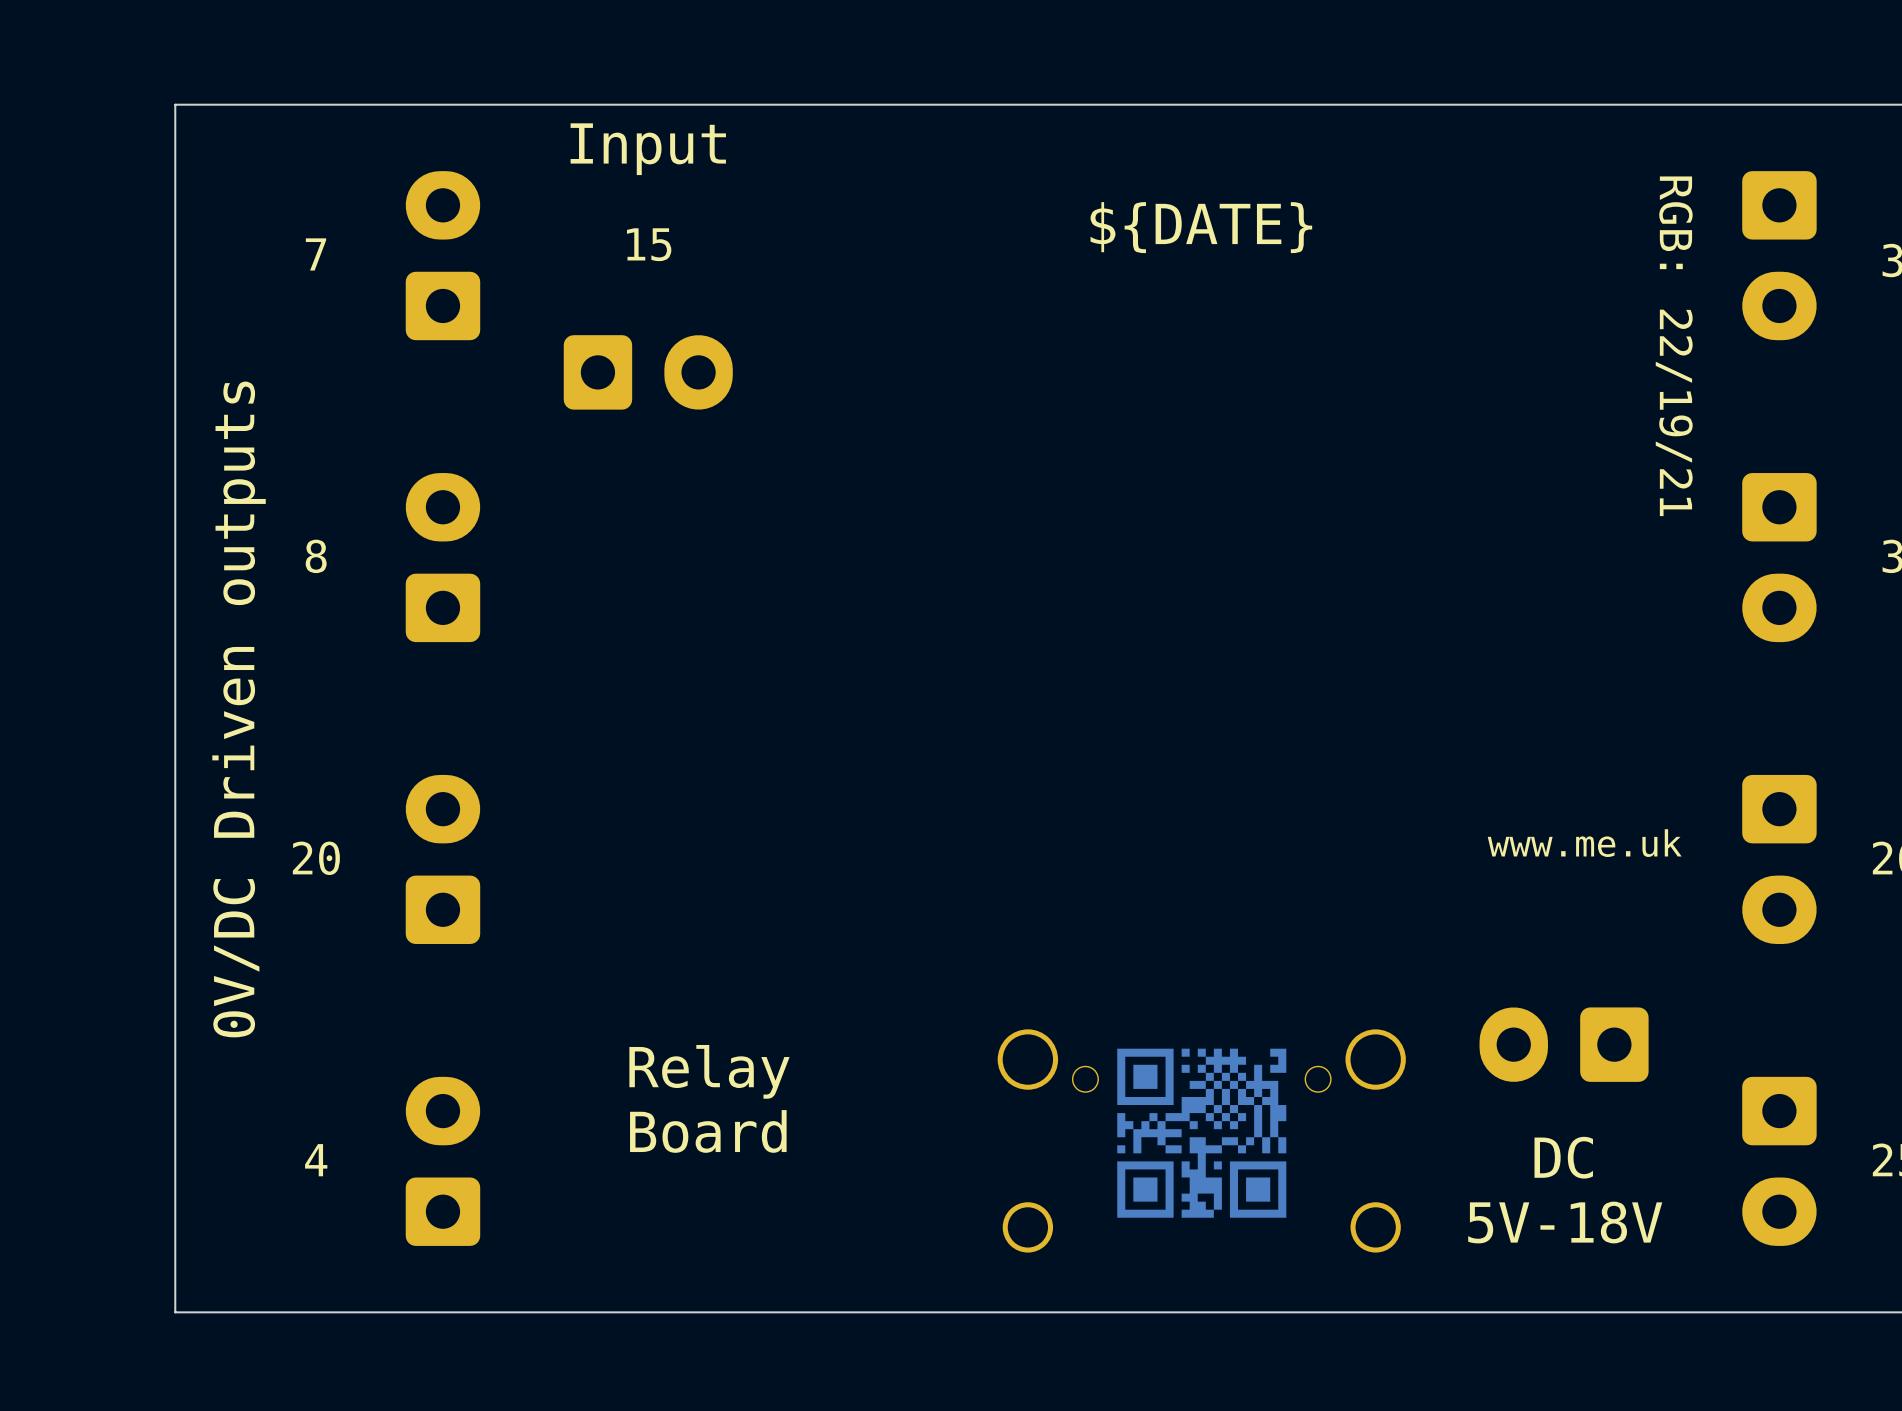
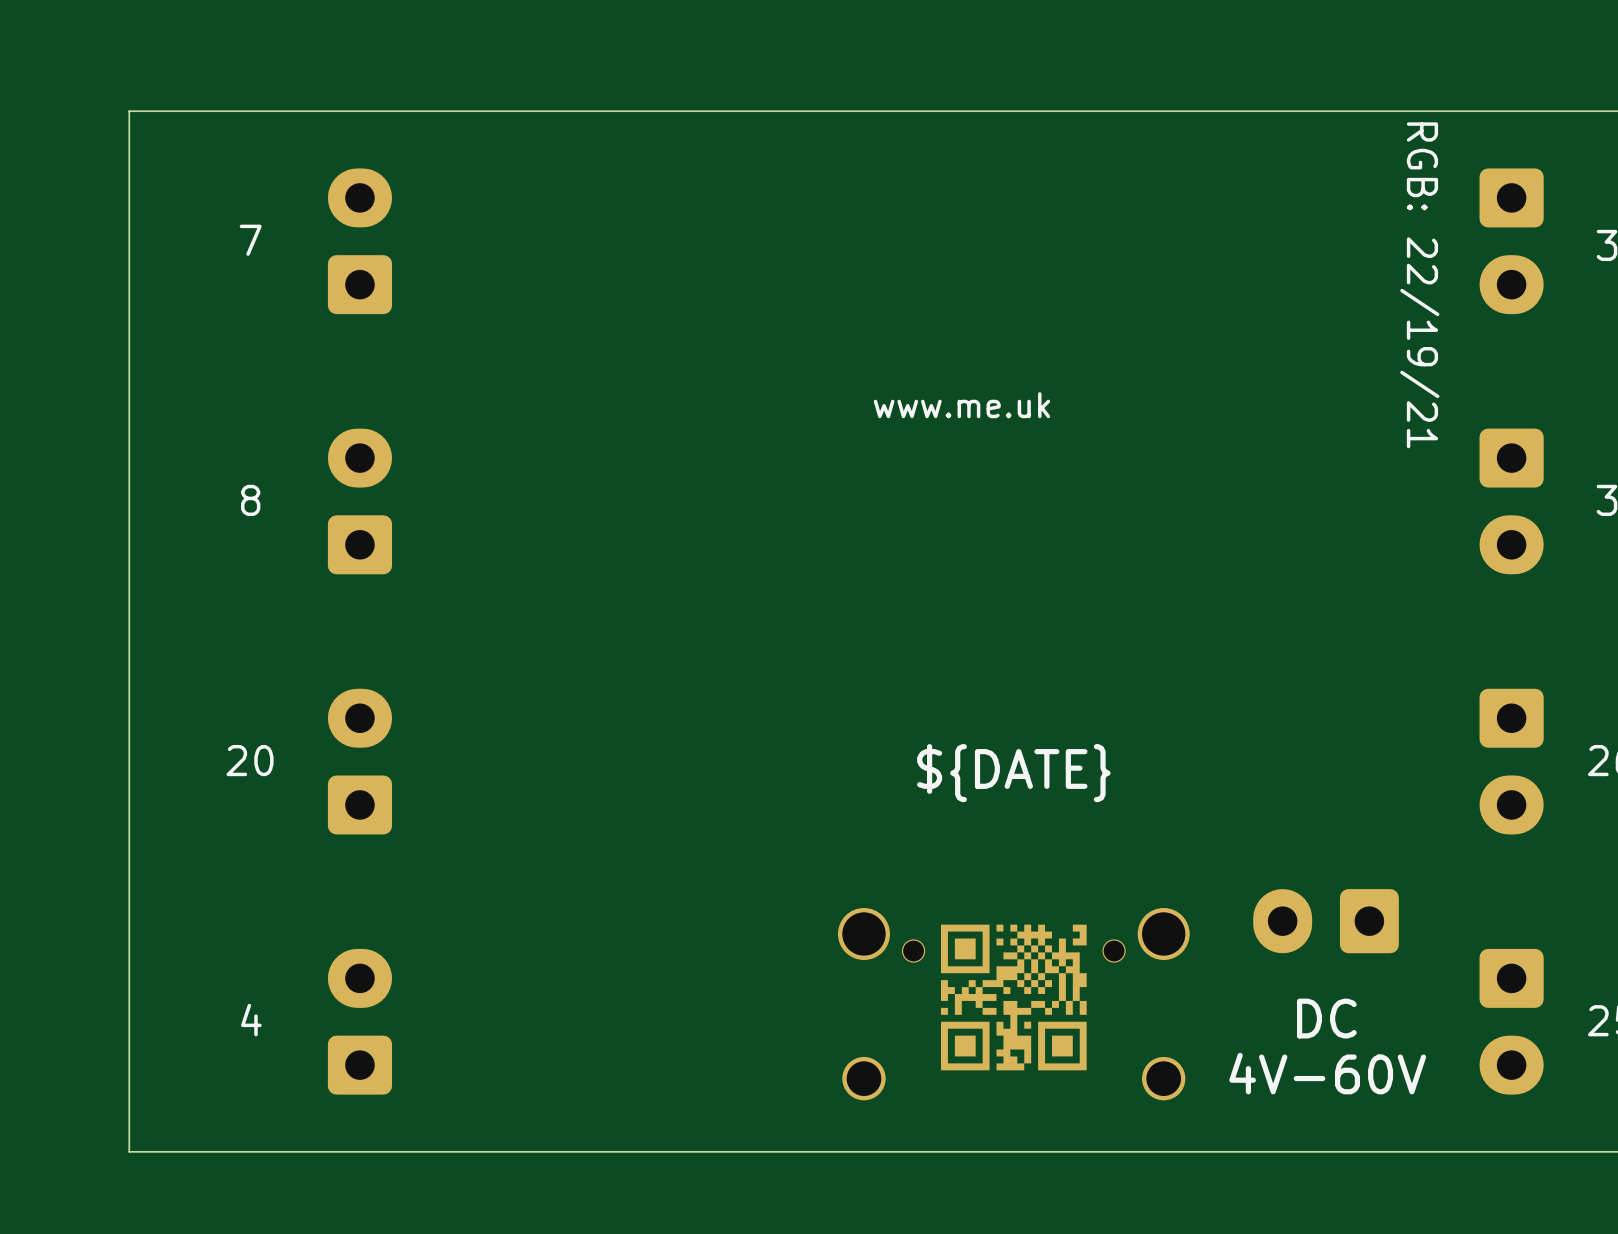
text: Input (648, 149) -> none
text position: ${DATE} (1201, 227) -> ${DATE} (1013, 773)
text: 15 (649, 244) -> none
text position: RGB: 22/19/21 (1674, 346) -> RGB: 22/19/21 (1419, 285)
part: (648, 372) -> none
text: 0V/DC Driven outputs (239, 709) -> none
drawing position: (1584, 843) -> (961, 405)
text: Relay (709, 1071) -> none
text: Board (708, 1131) -> none
text: 5V-18V (1565, 1222) -> 4V-60V (1327, 1073)

